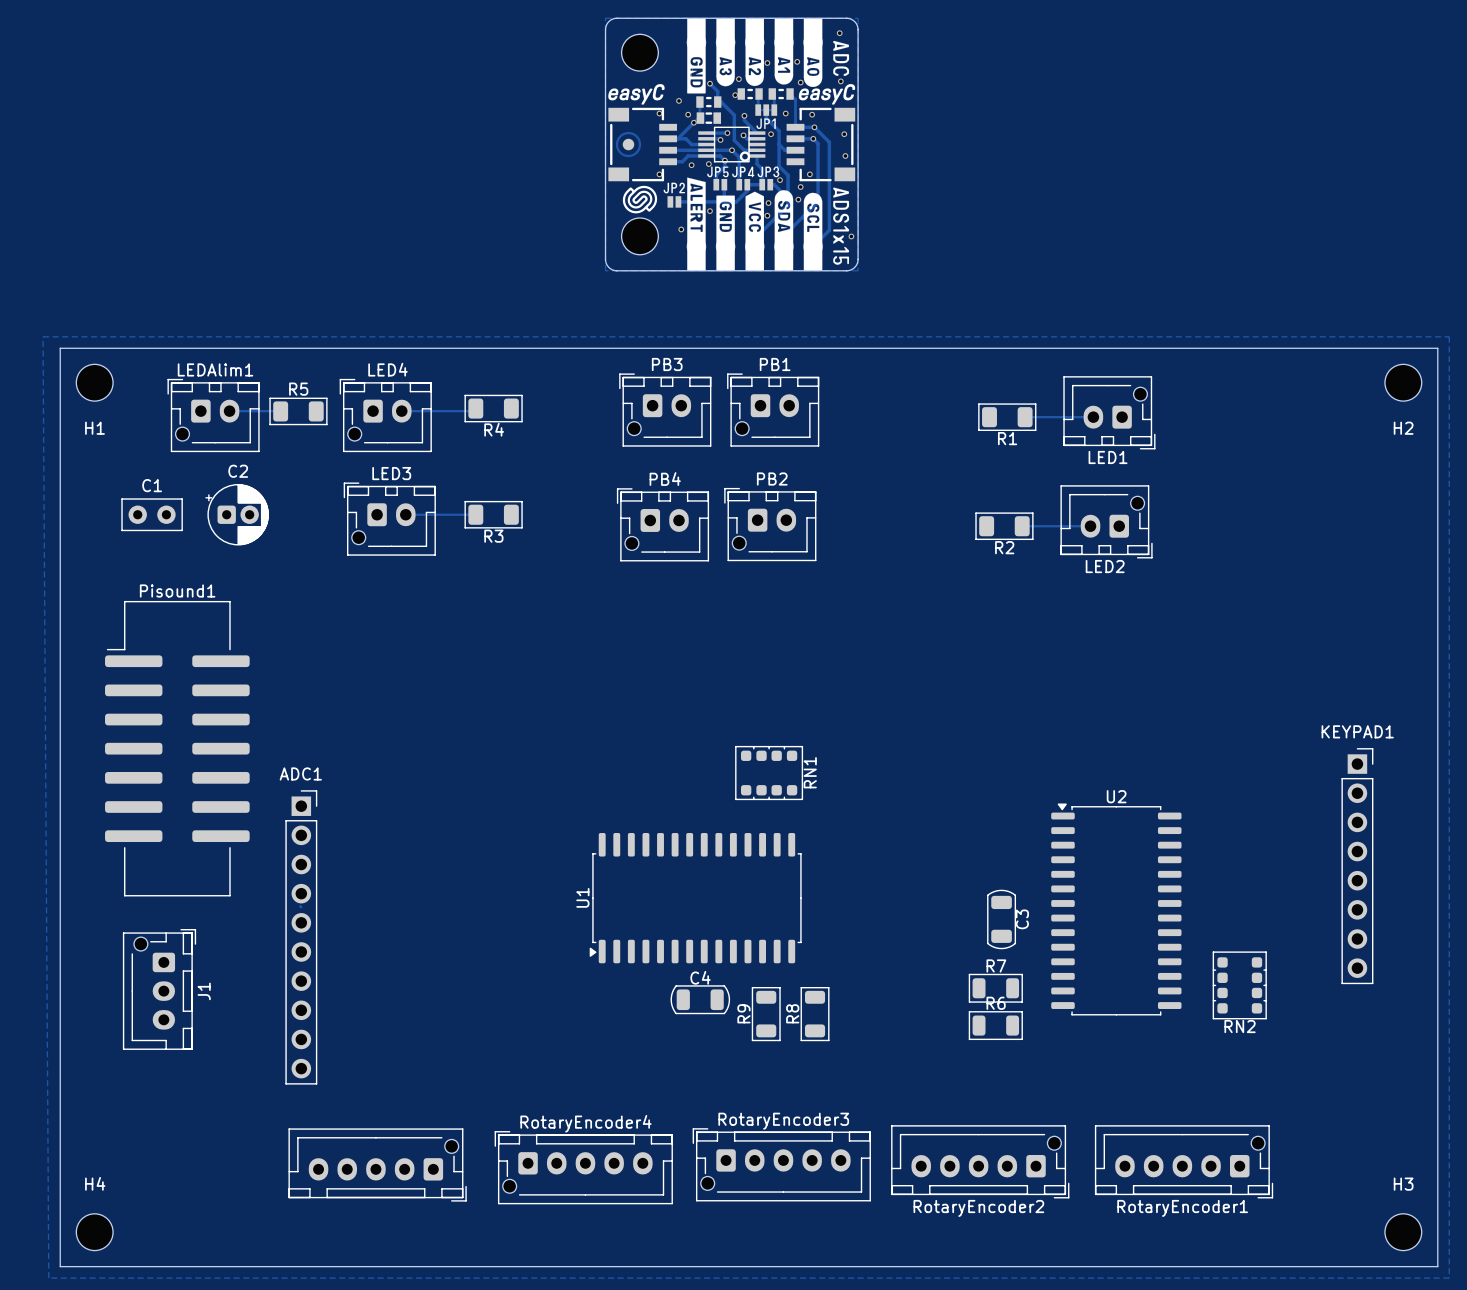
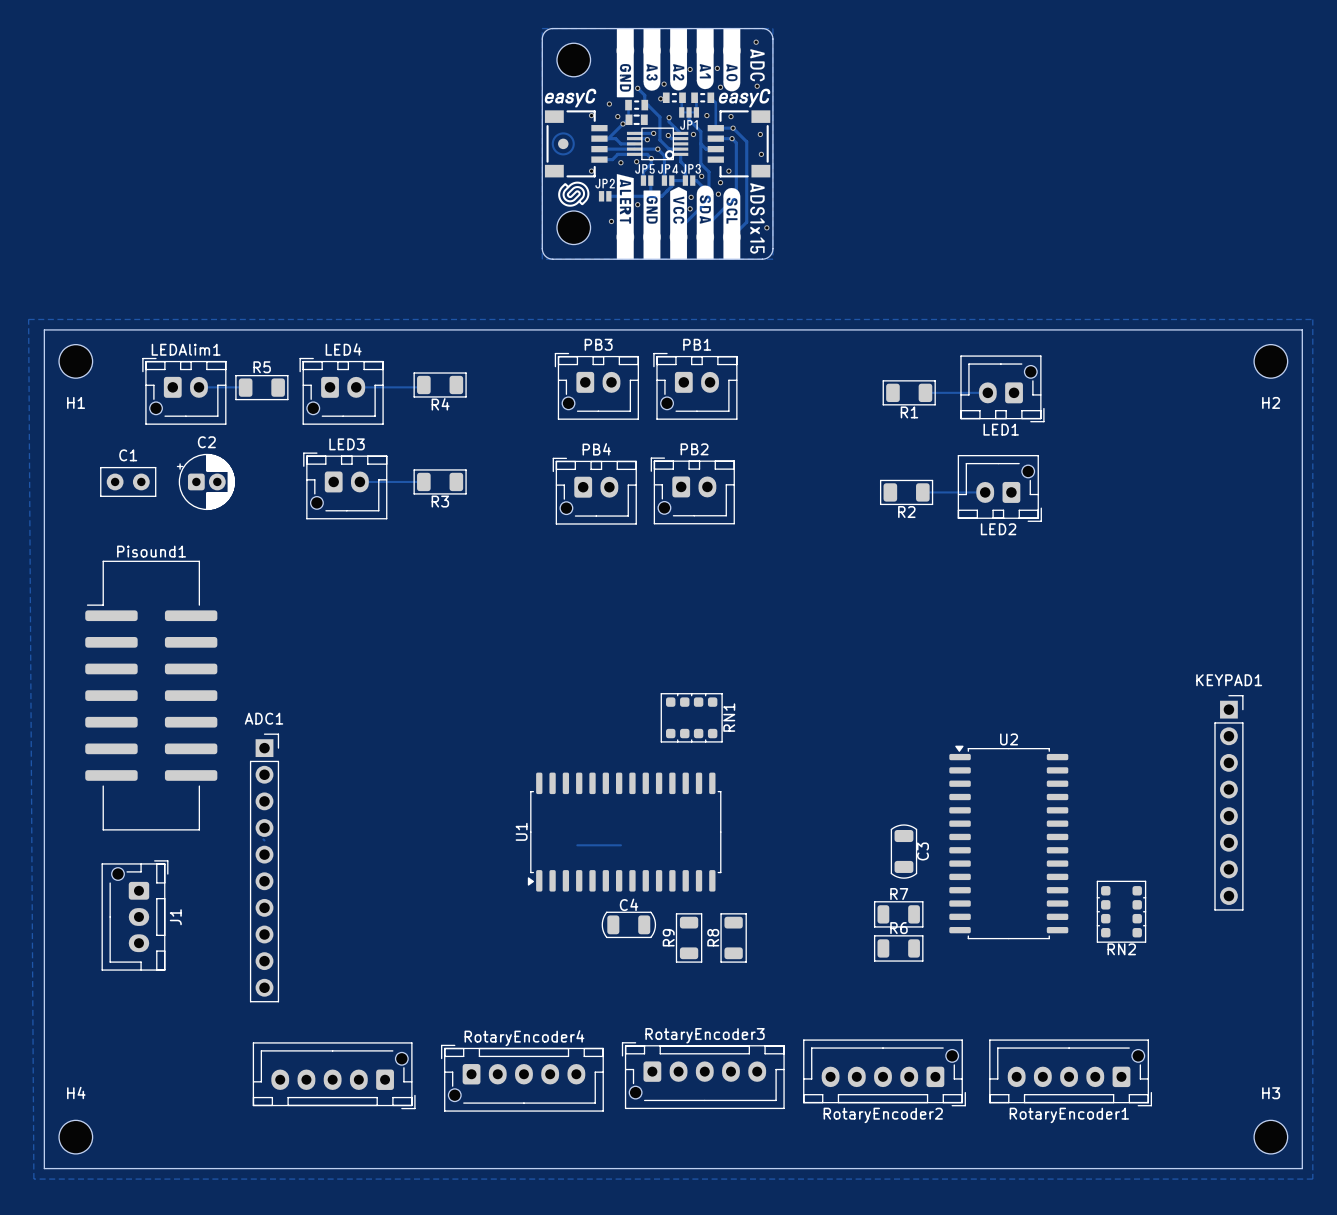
track: none -> (577, 845) (620, 845)

